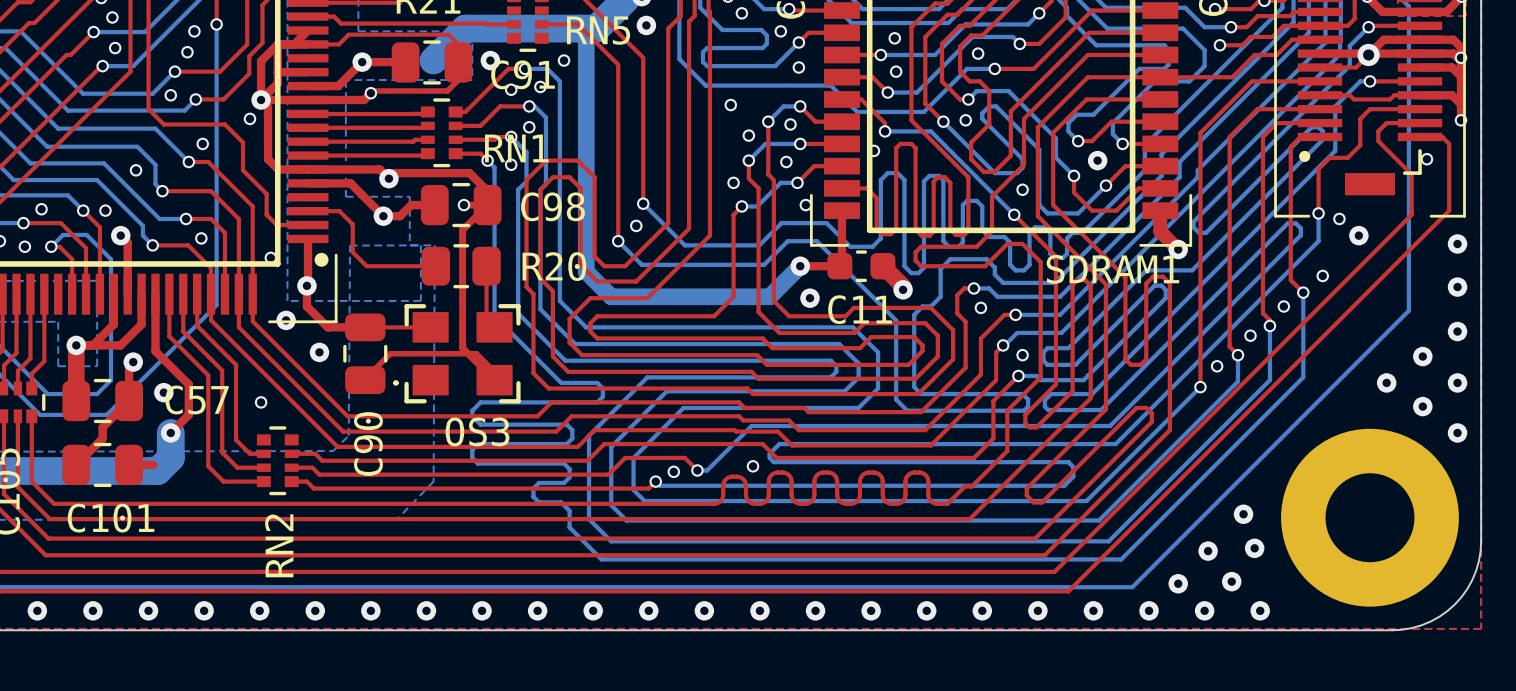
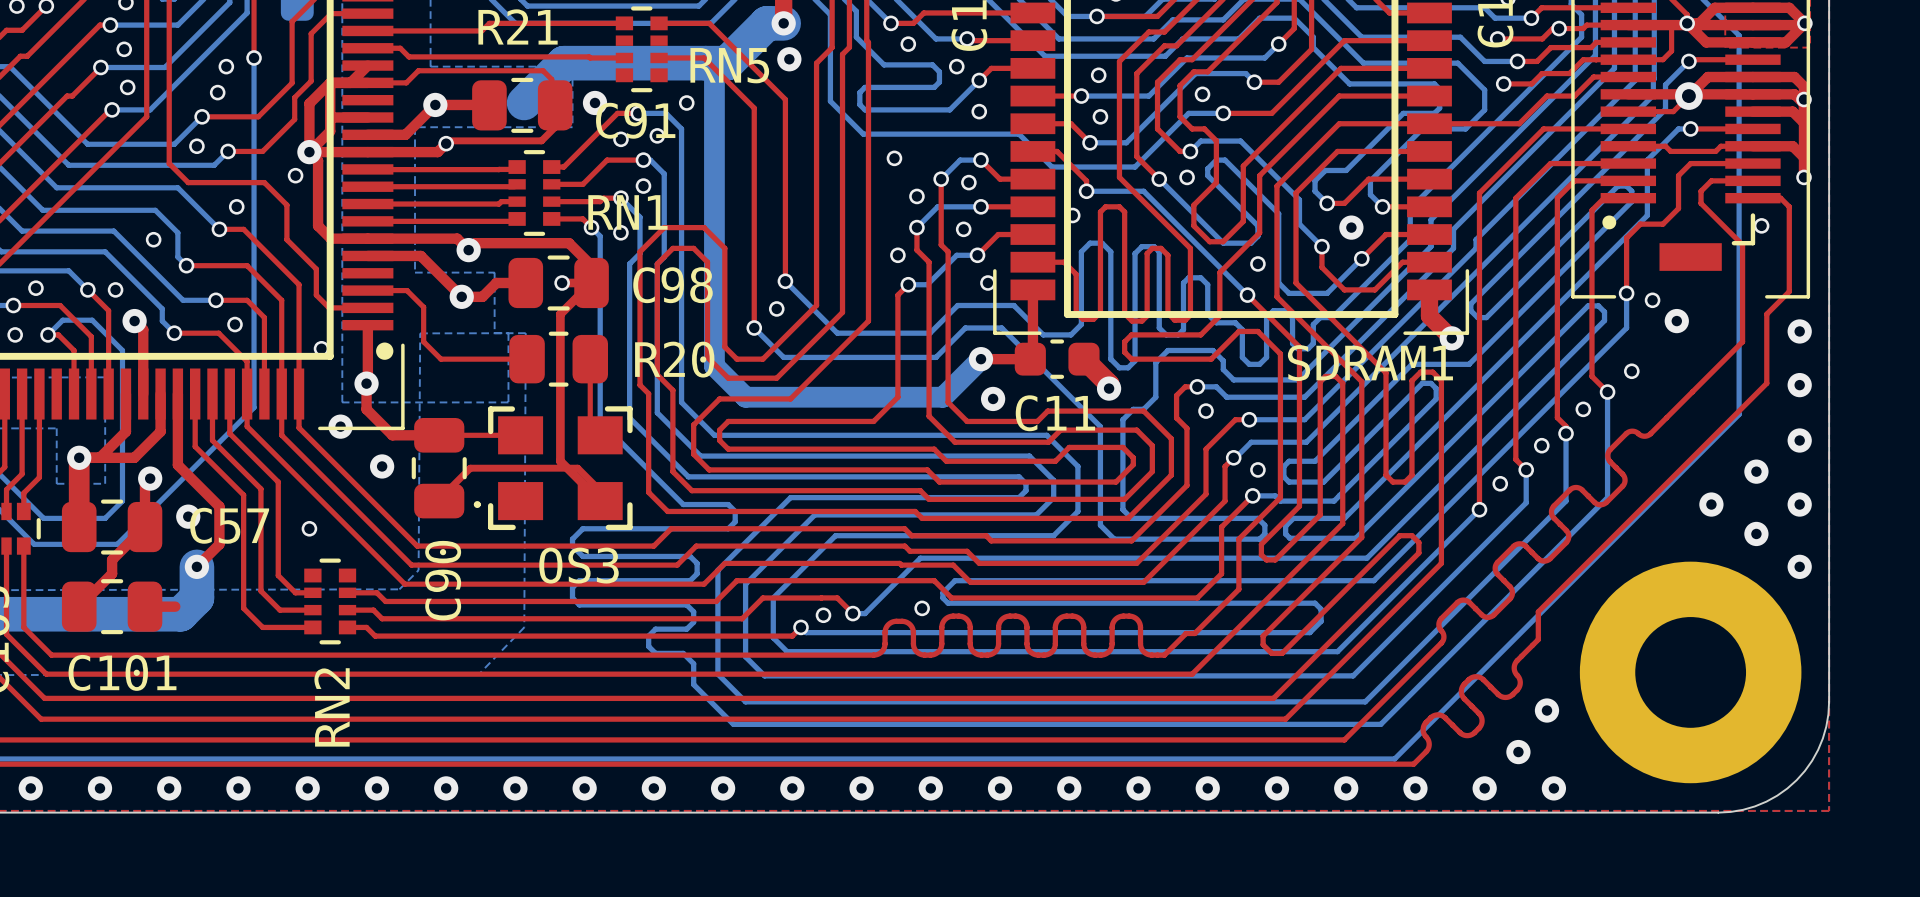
top track: (1449, 210) (1068, 591) -> (1789, 289) (1766, 314) (1766, 383) (1538, 611) (1538, 639) (1515, 663) (1514, 670) (1520, 683) (1512, 694) (1507, 697) (1502, 696) (1481, 678) (1476, 676) (1470, 678) (1462, 685) (1461, 693) (1480, 715) (1482, 720) (1480, 726) (1472, 734) (1464, 735) (1443, 716) (1437, 714) (1432, 716) (1423, 728) (1428, 742) (1428, 747) (1413, 764) (1315, 764)
top track: (1411, 214) (1054, 571) -> (1742, 295) (1742, 341) (1649, 434) (1643, 436) (1634, 431) (1628, 432) (1608, 451) (1608, 460) (1624, 476) (1622, 486) (1605, 503) (1600, 504) (1595, 503) (1580, 488) (1573, 487) (1553, 506) (1552, 516) (1566, 531) (1568, 536) (1566, 541) (1550, 558) (1540, 560) (1524, 545) (1518, 543) (1514, 545) (1495, 566) (1496, 572) (1510, 587) (1512, 592) (1510, 598) (1494, 614) (1484, 616) (1468, 601) (1458, 601) (1439, 621) (1439, 626) (1443, 635) (1442, 642) (1344, 739) (1297, 739)
via: (1243, 514) -> none
via: (1208, 551) -> none
via: (1178, 583) -> none

